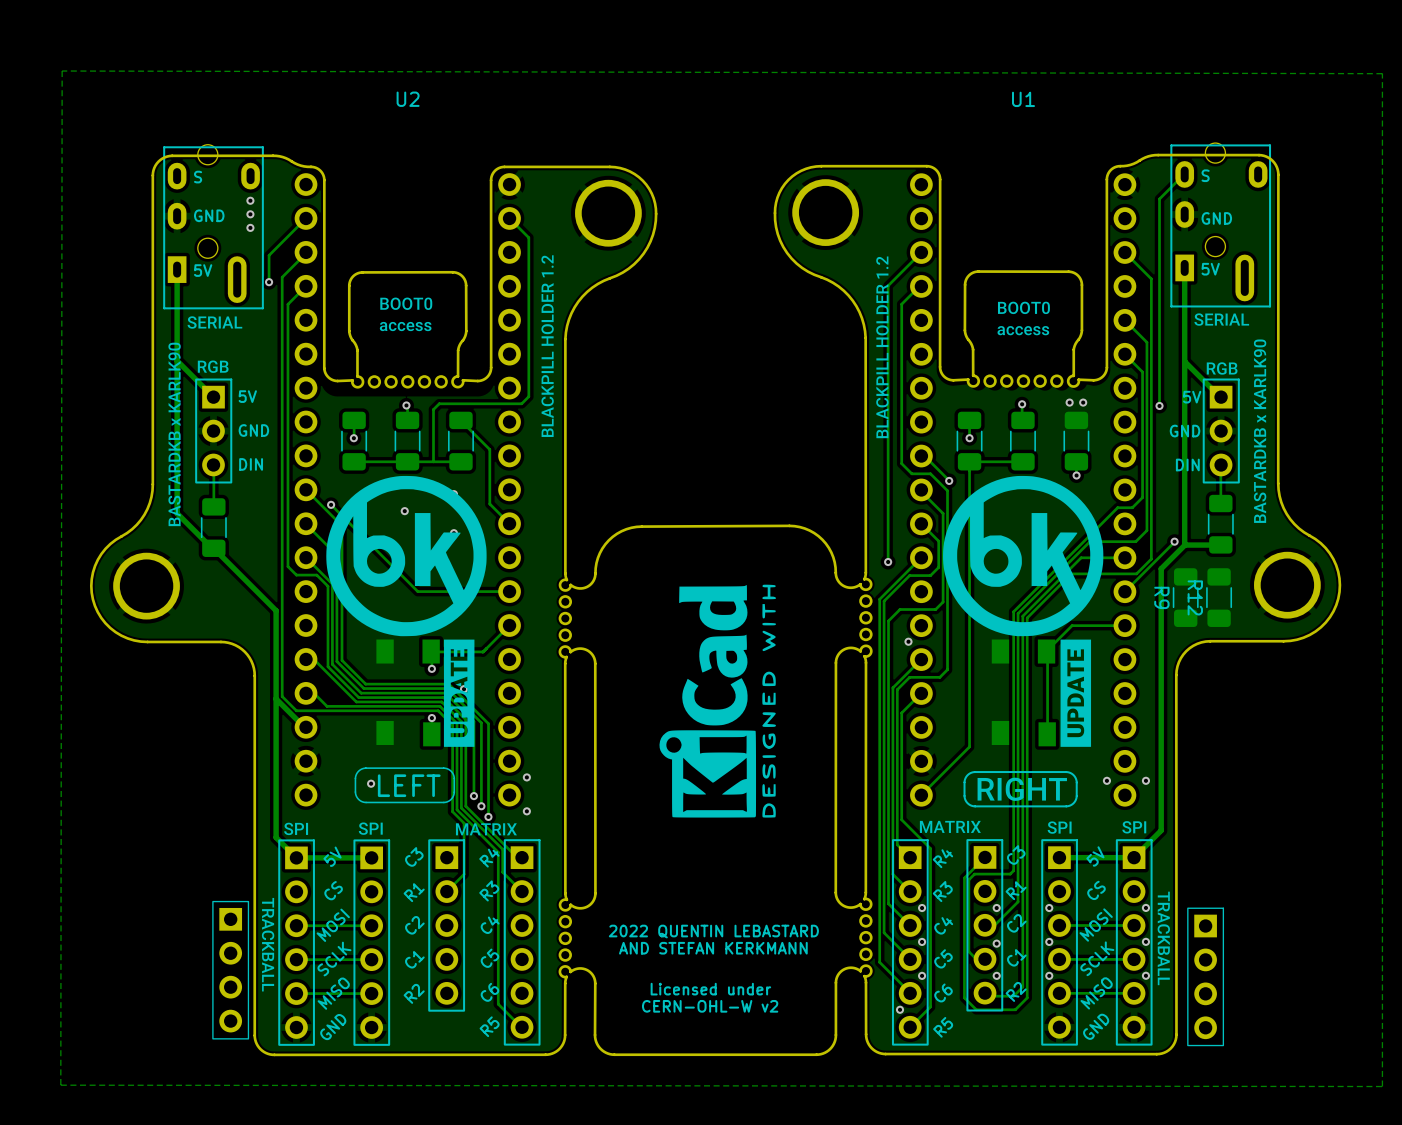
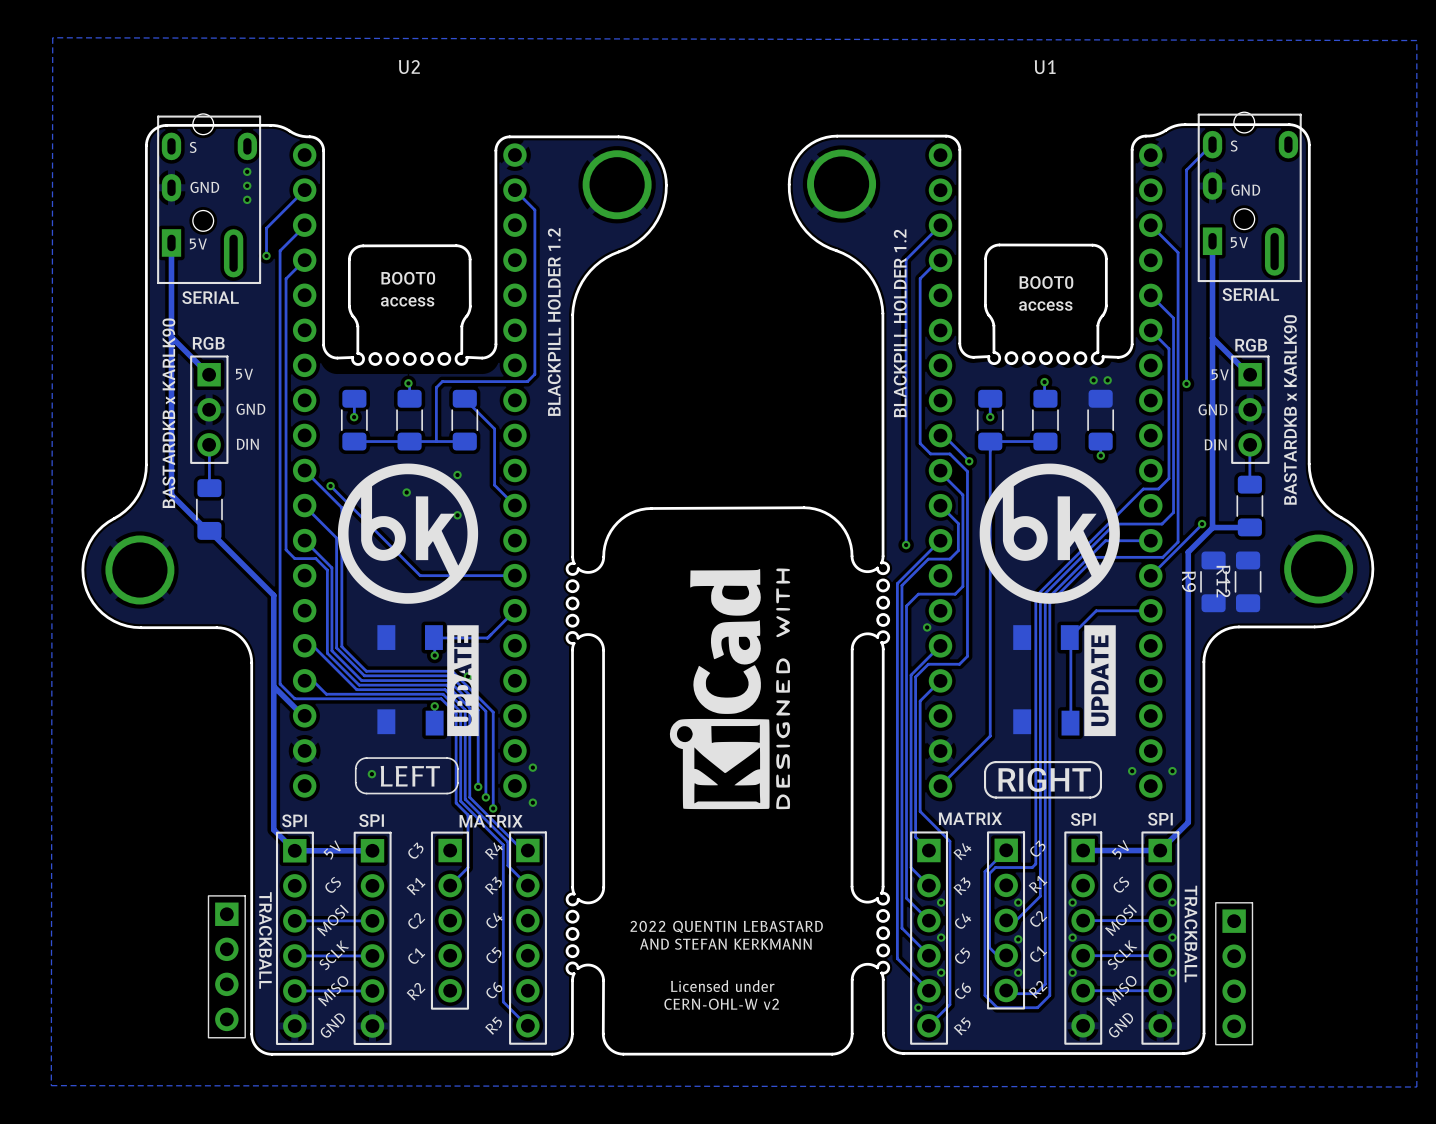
drawing shape: [326, 475, 487, 637] -> [337, 463, 479, 604]
drawing shape: [943, 475, 1104, 637] -> [979, 463, 1120, 604]

